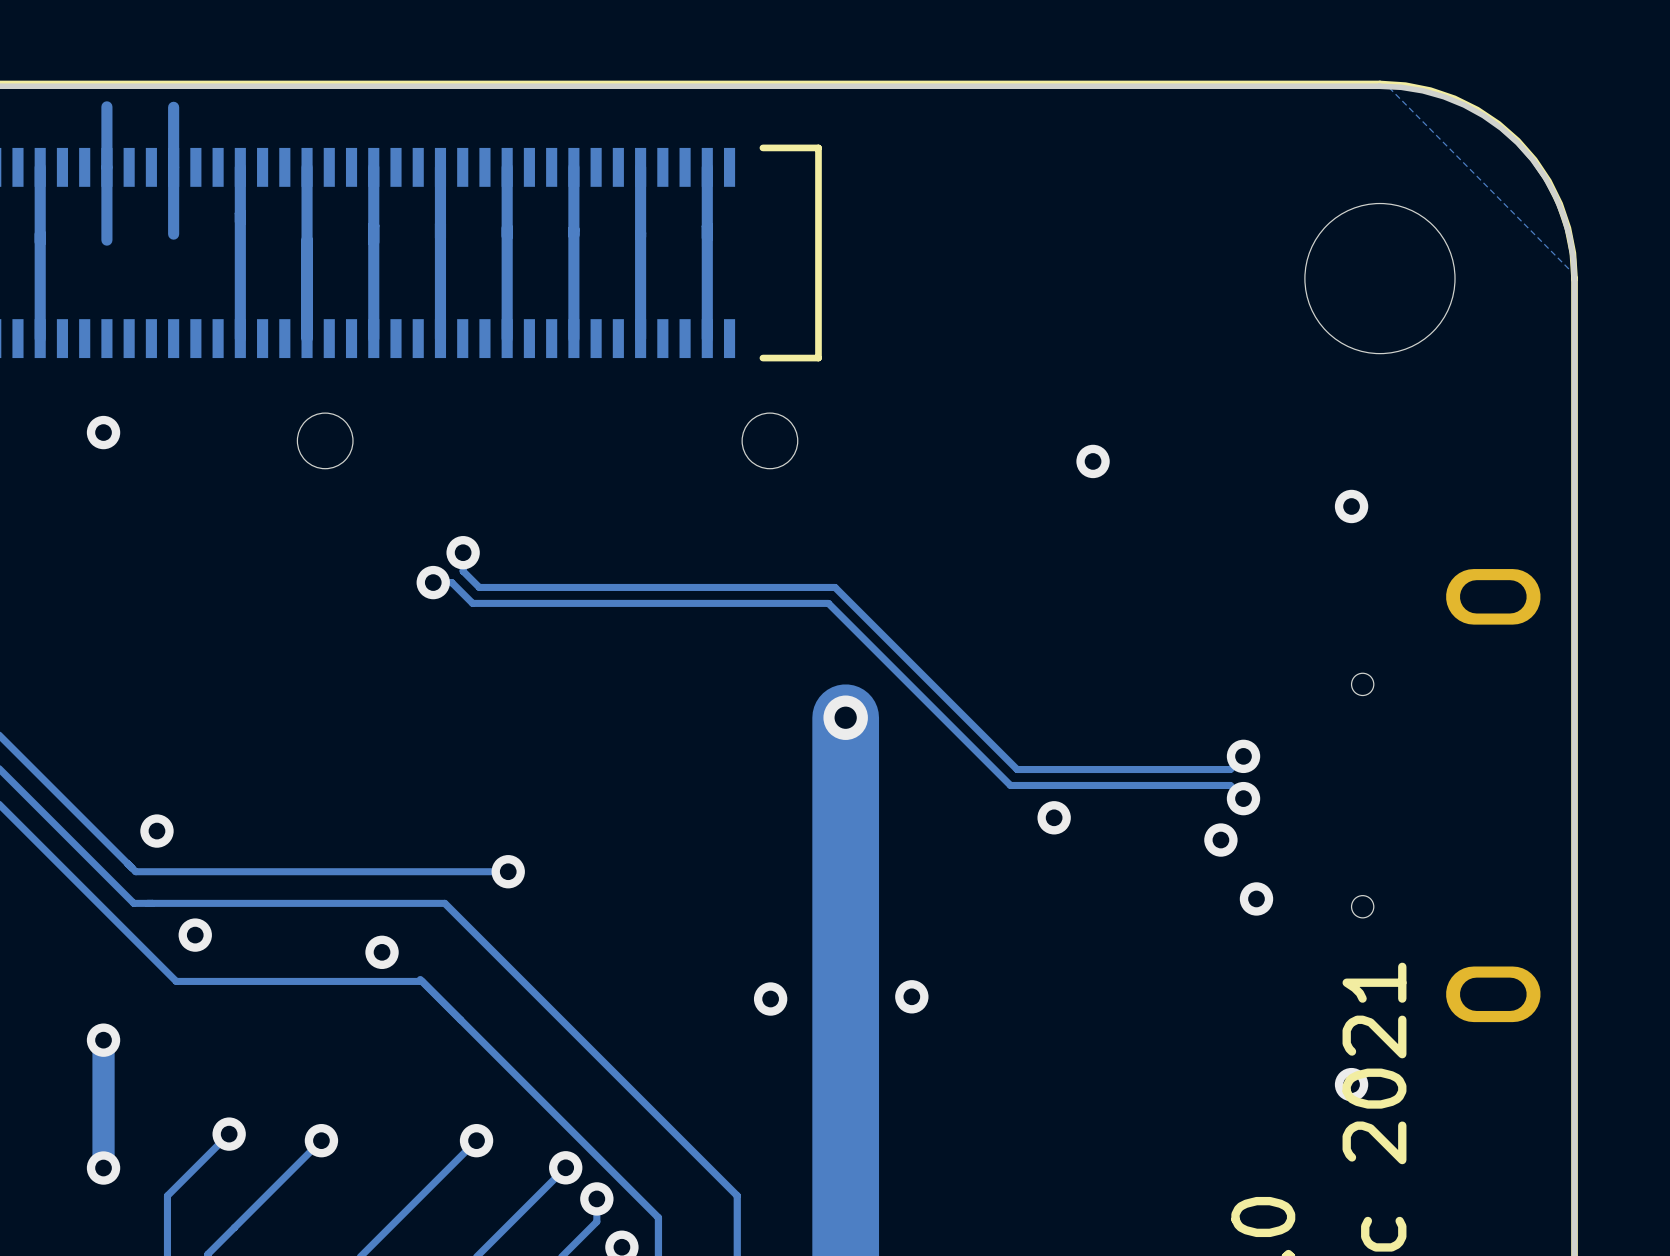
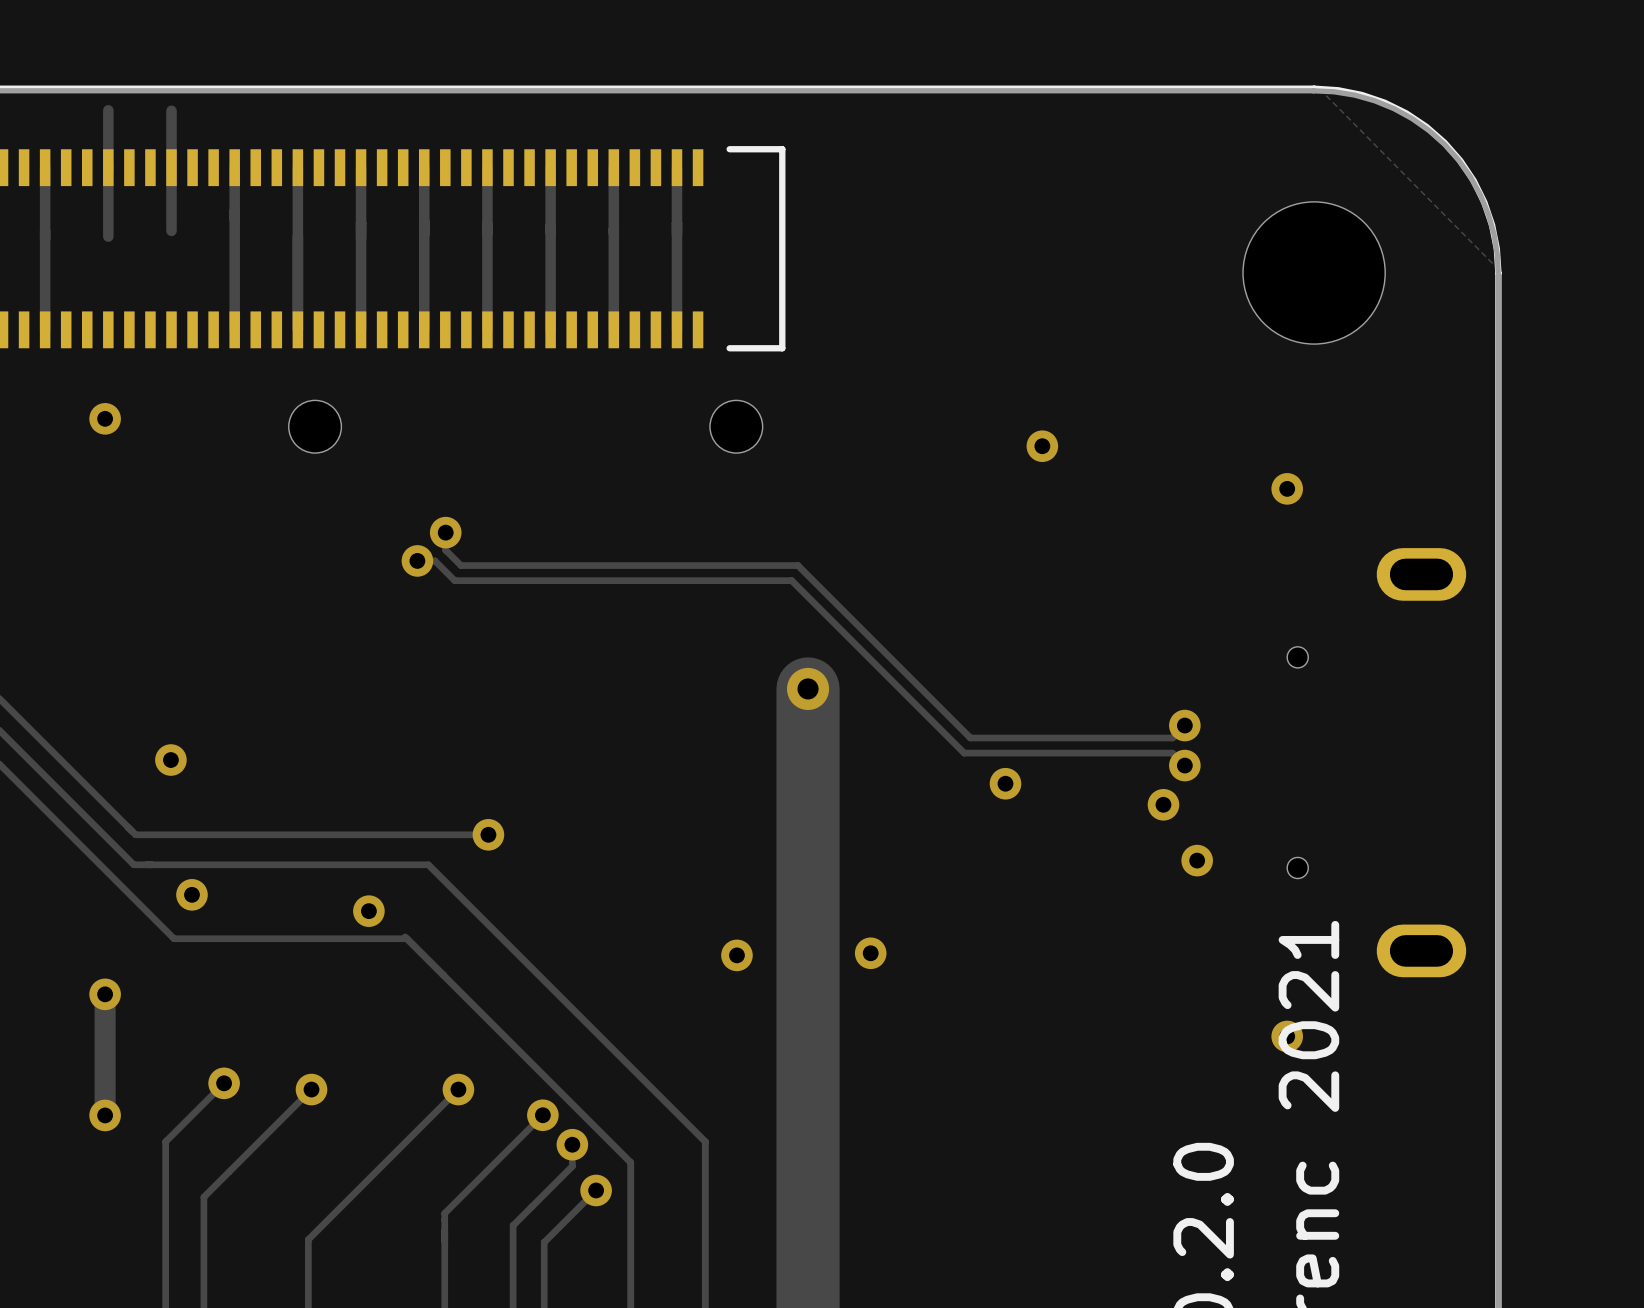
via position: (156, 831) -> (170, 760)

